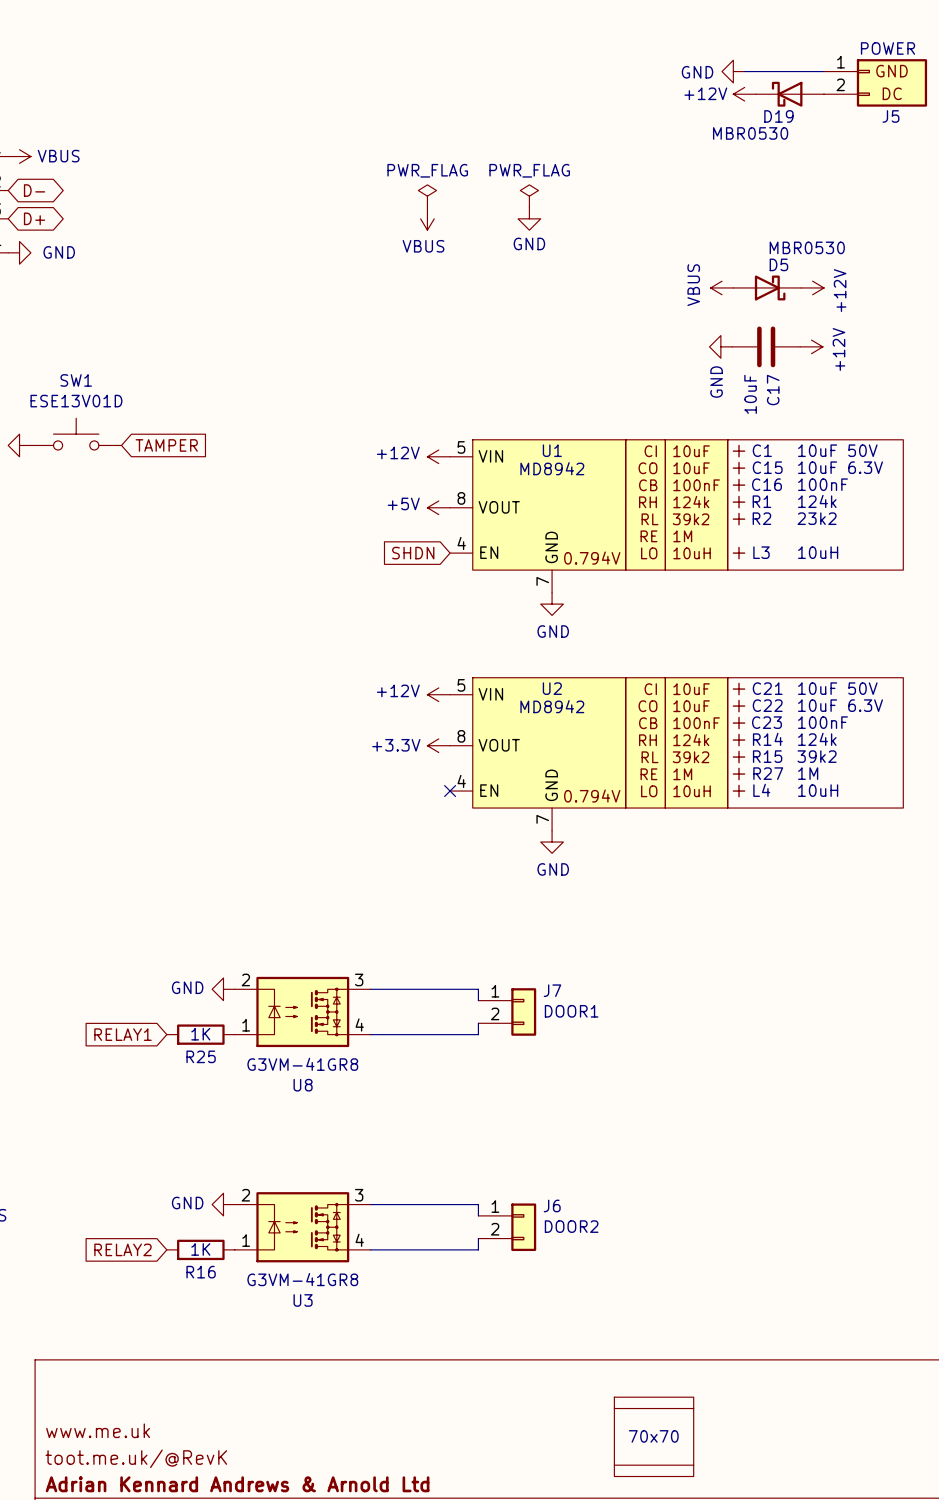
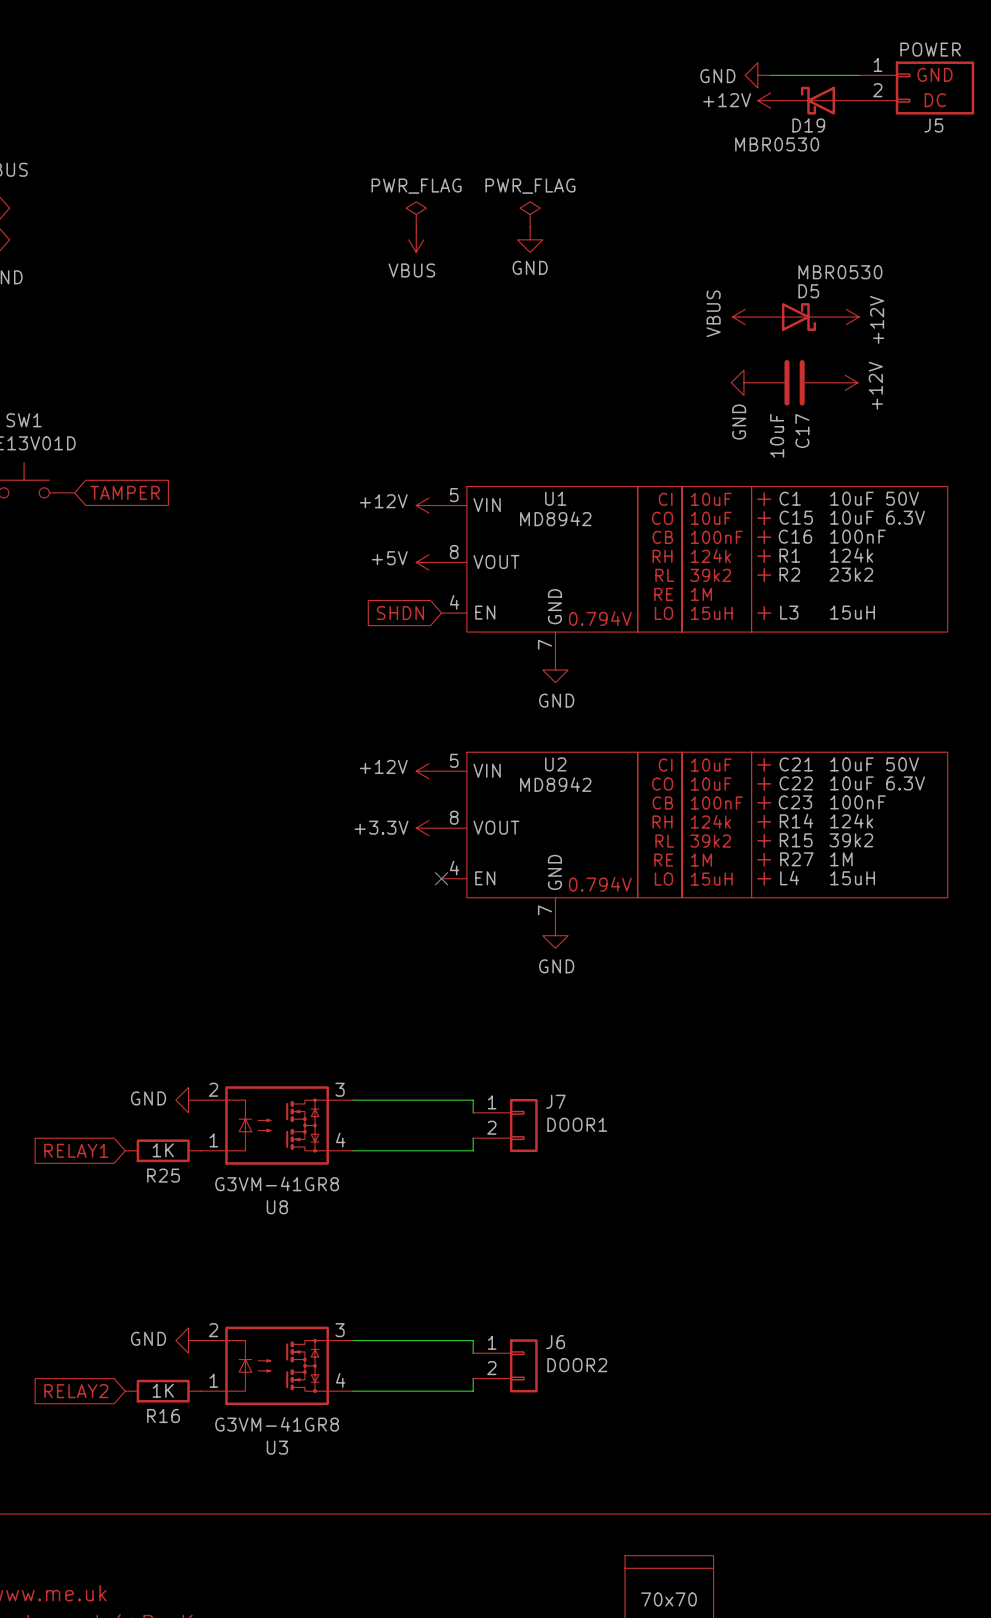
L3 value: 10uH (818, 552) -> 15uH (852, 612)
U1 text: 10uH (692, 553) -> 15uH (711, 613)
L4 value: 10uH (818, 790) -> 15uH (852, 878)
U2 text: 10uH (692, 791) -> 15uH (711, 879)

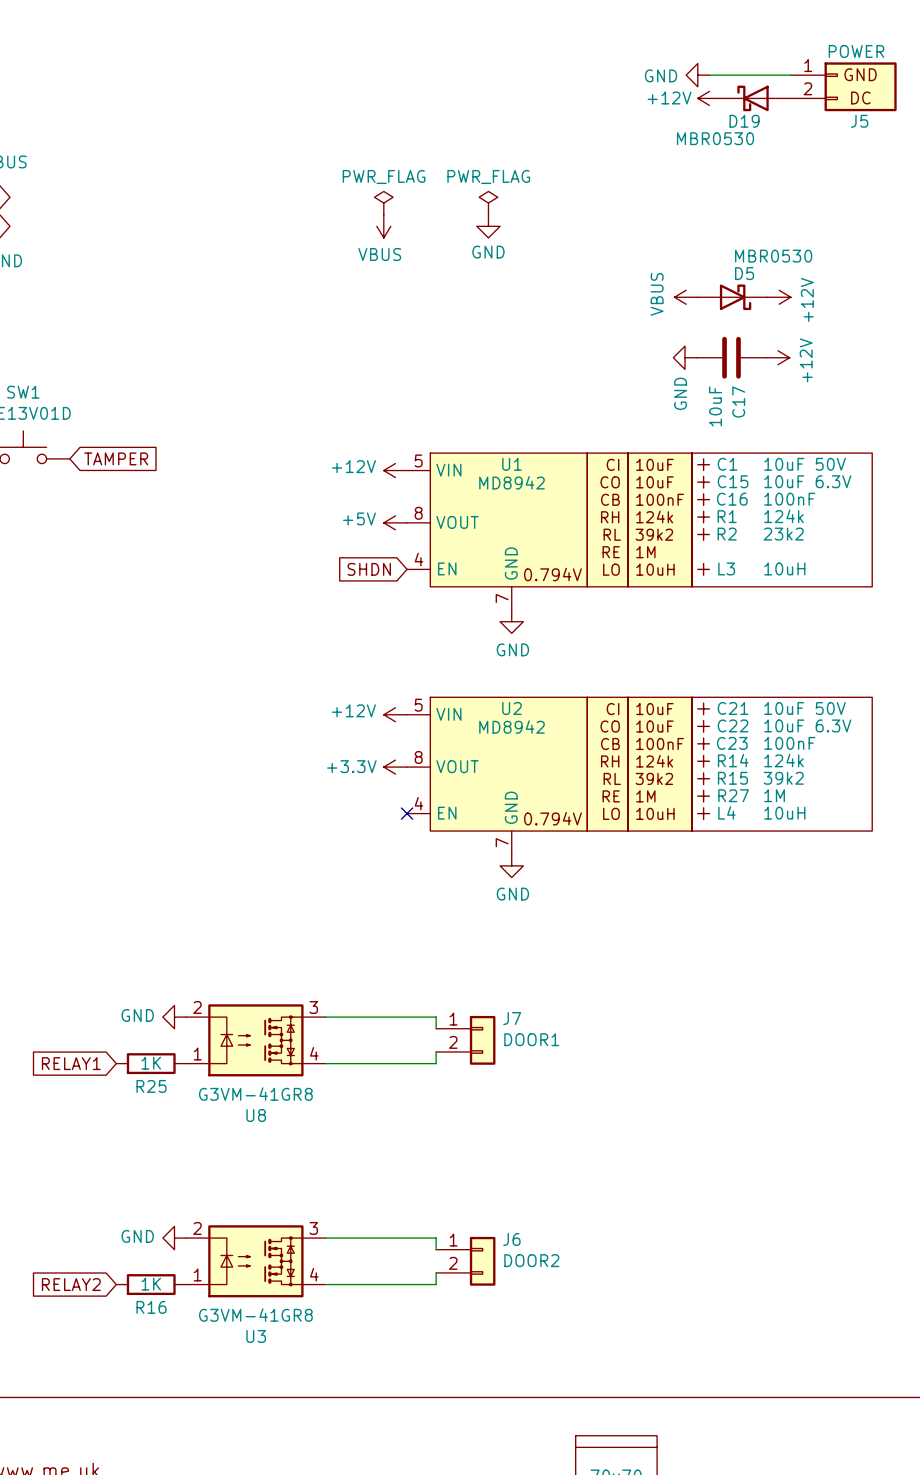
L3 value: 15uH (852, 612) -> 10uH (784, 568)
U1 text: 15uH (711, 613) -> 10uH (655, 569)
L4 value: 15uH (852, 878) -> 10uH (784, 813)
U2 text: 15uH (711, 879) -> 10uH (655, 813)

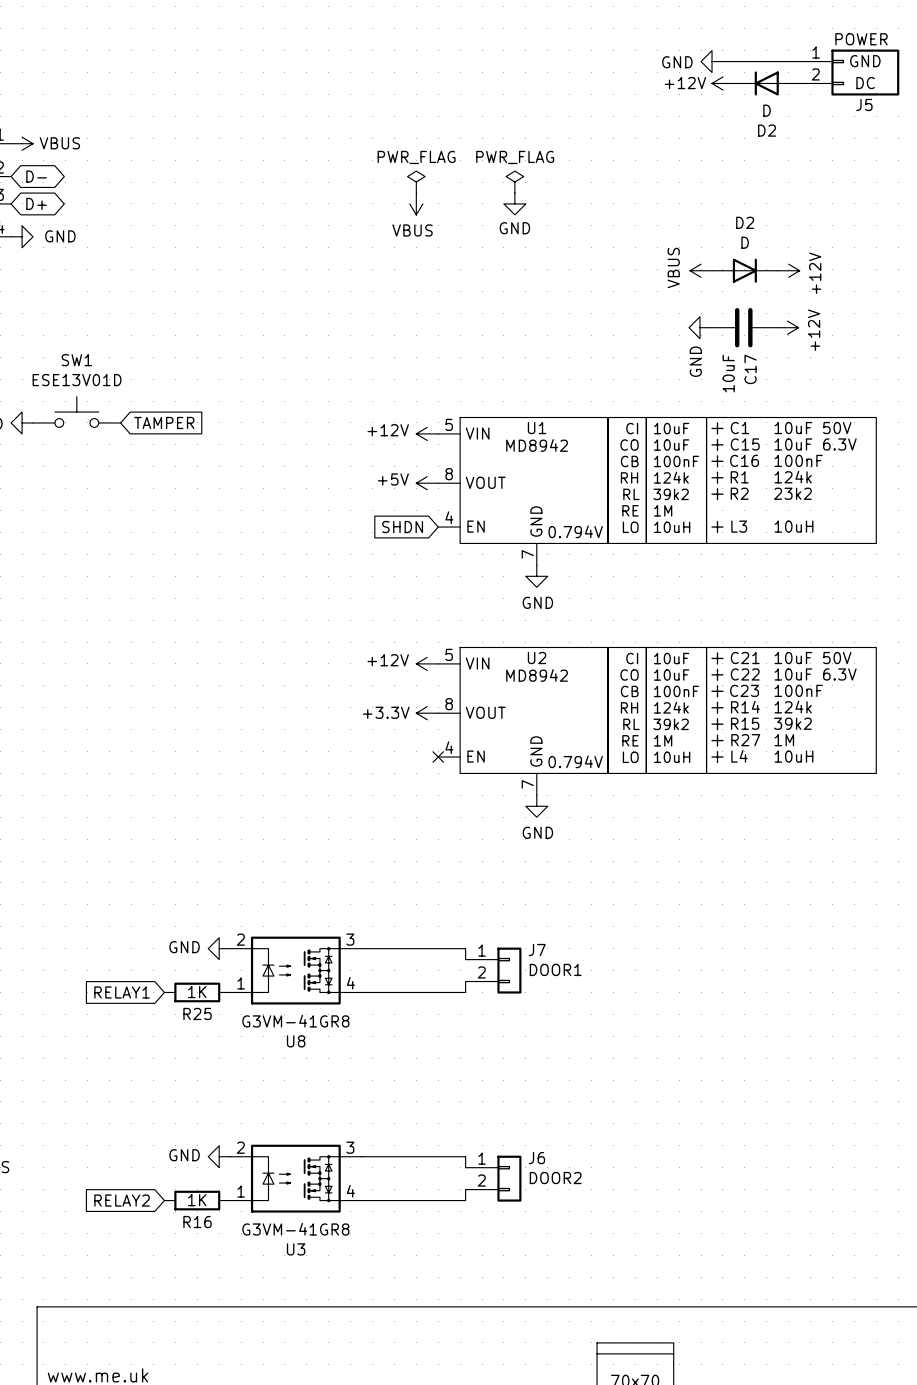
D19: MBR0530 (755, 98) -> none
D2: none -> D (766, 83)
D5: MBR0530 (732, 297) -> none
D2: none -> D (744, 270)

